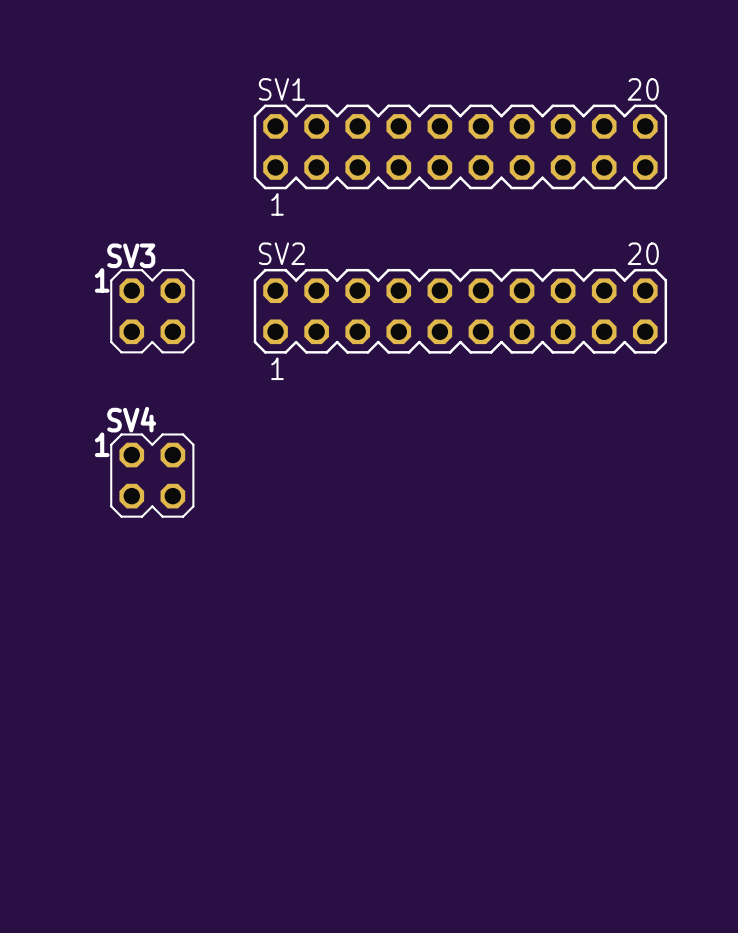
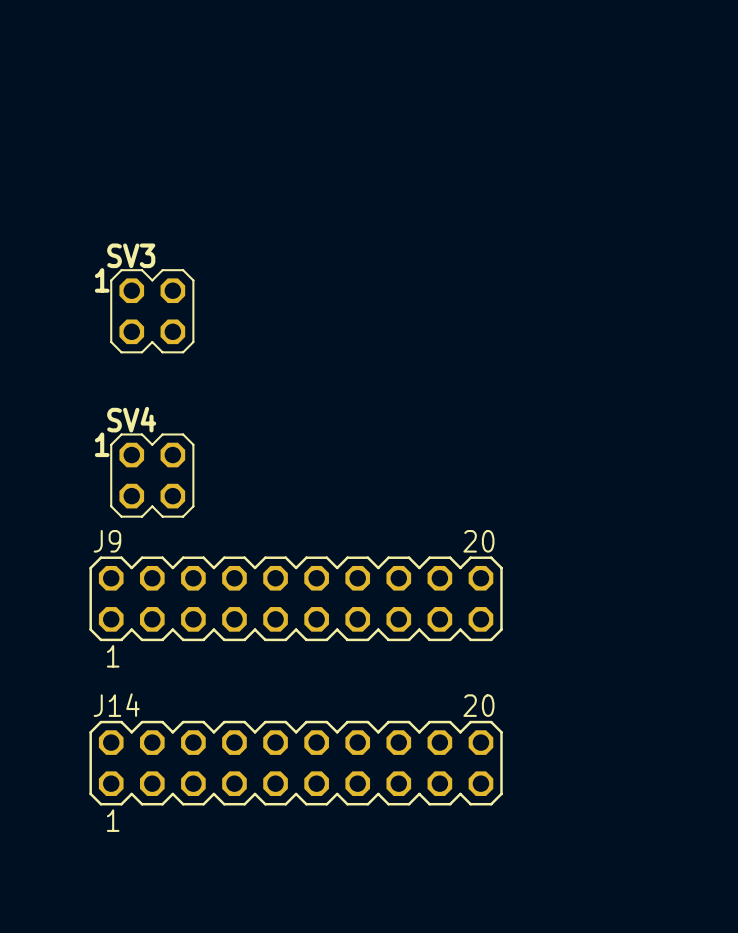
SV1: (460, 146) -> none
SV2: (460, 311) -> none
J9: none -> (296, 598)
J14: none -> (296, 763)

